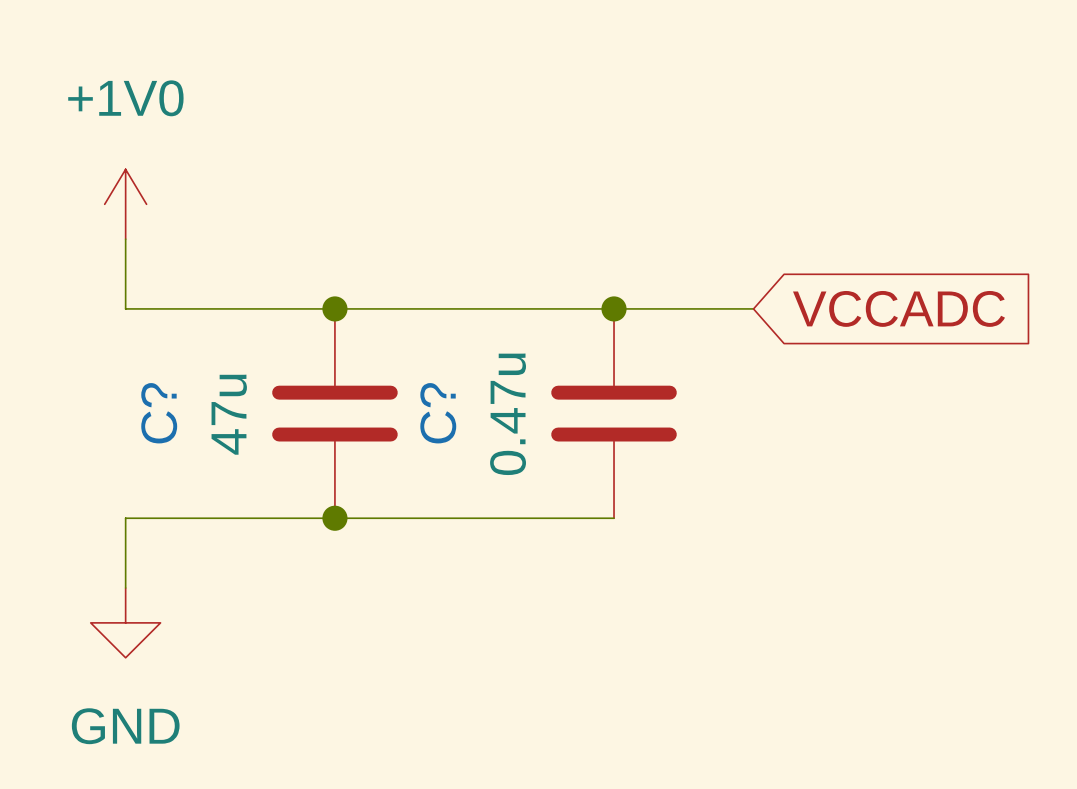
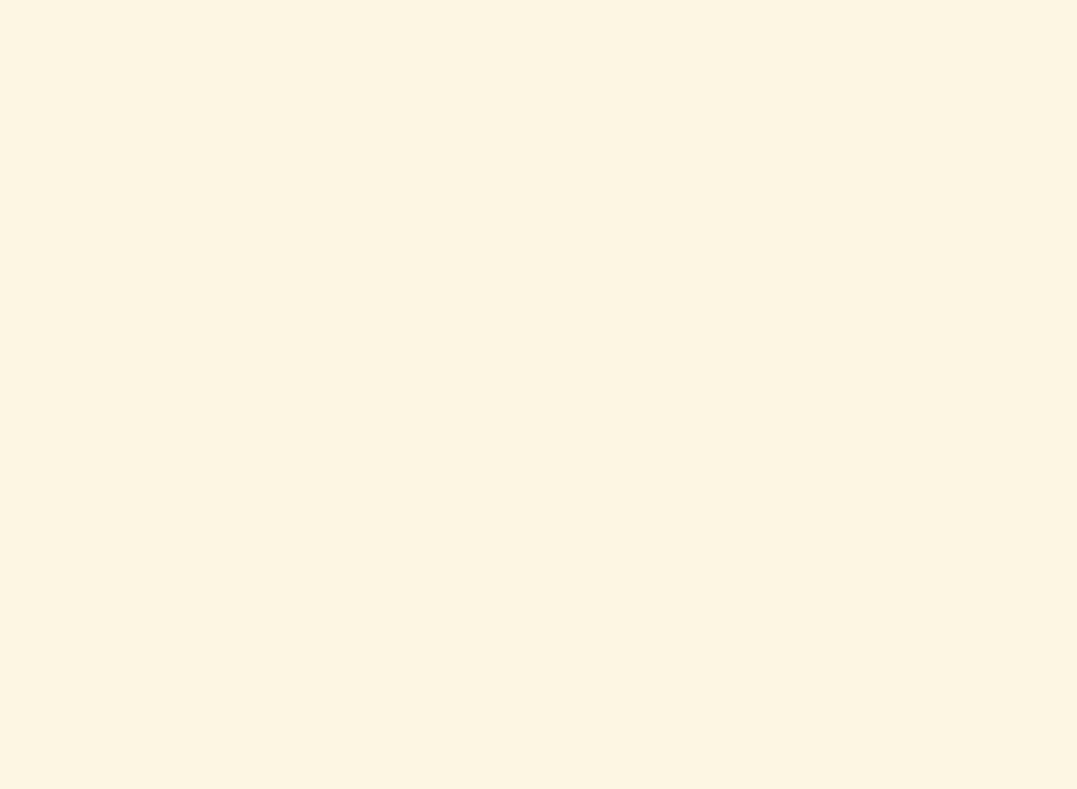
power symbol: +1V0 (125, 204) -> none
wire: (125, 239) (125, 308) (753, 308) -> none
junction: (334, 308) -> none
junction: (614, 308) -> none
global label: VCCADC (898, 308) -> none
C?: 47u (334, 413) -> none
C?: 0.47u (614, 413) -> none
junction: (334, 518) -> none
wire: (614, 518) (125, 518) (125, 588) -> none
power symbol: GND (125, 622) -> none

